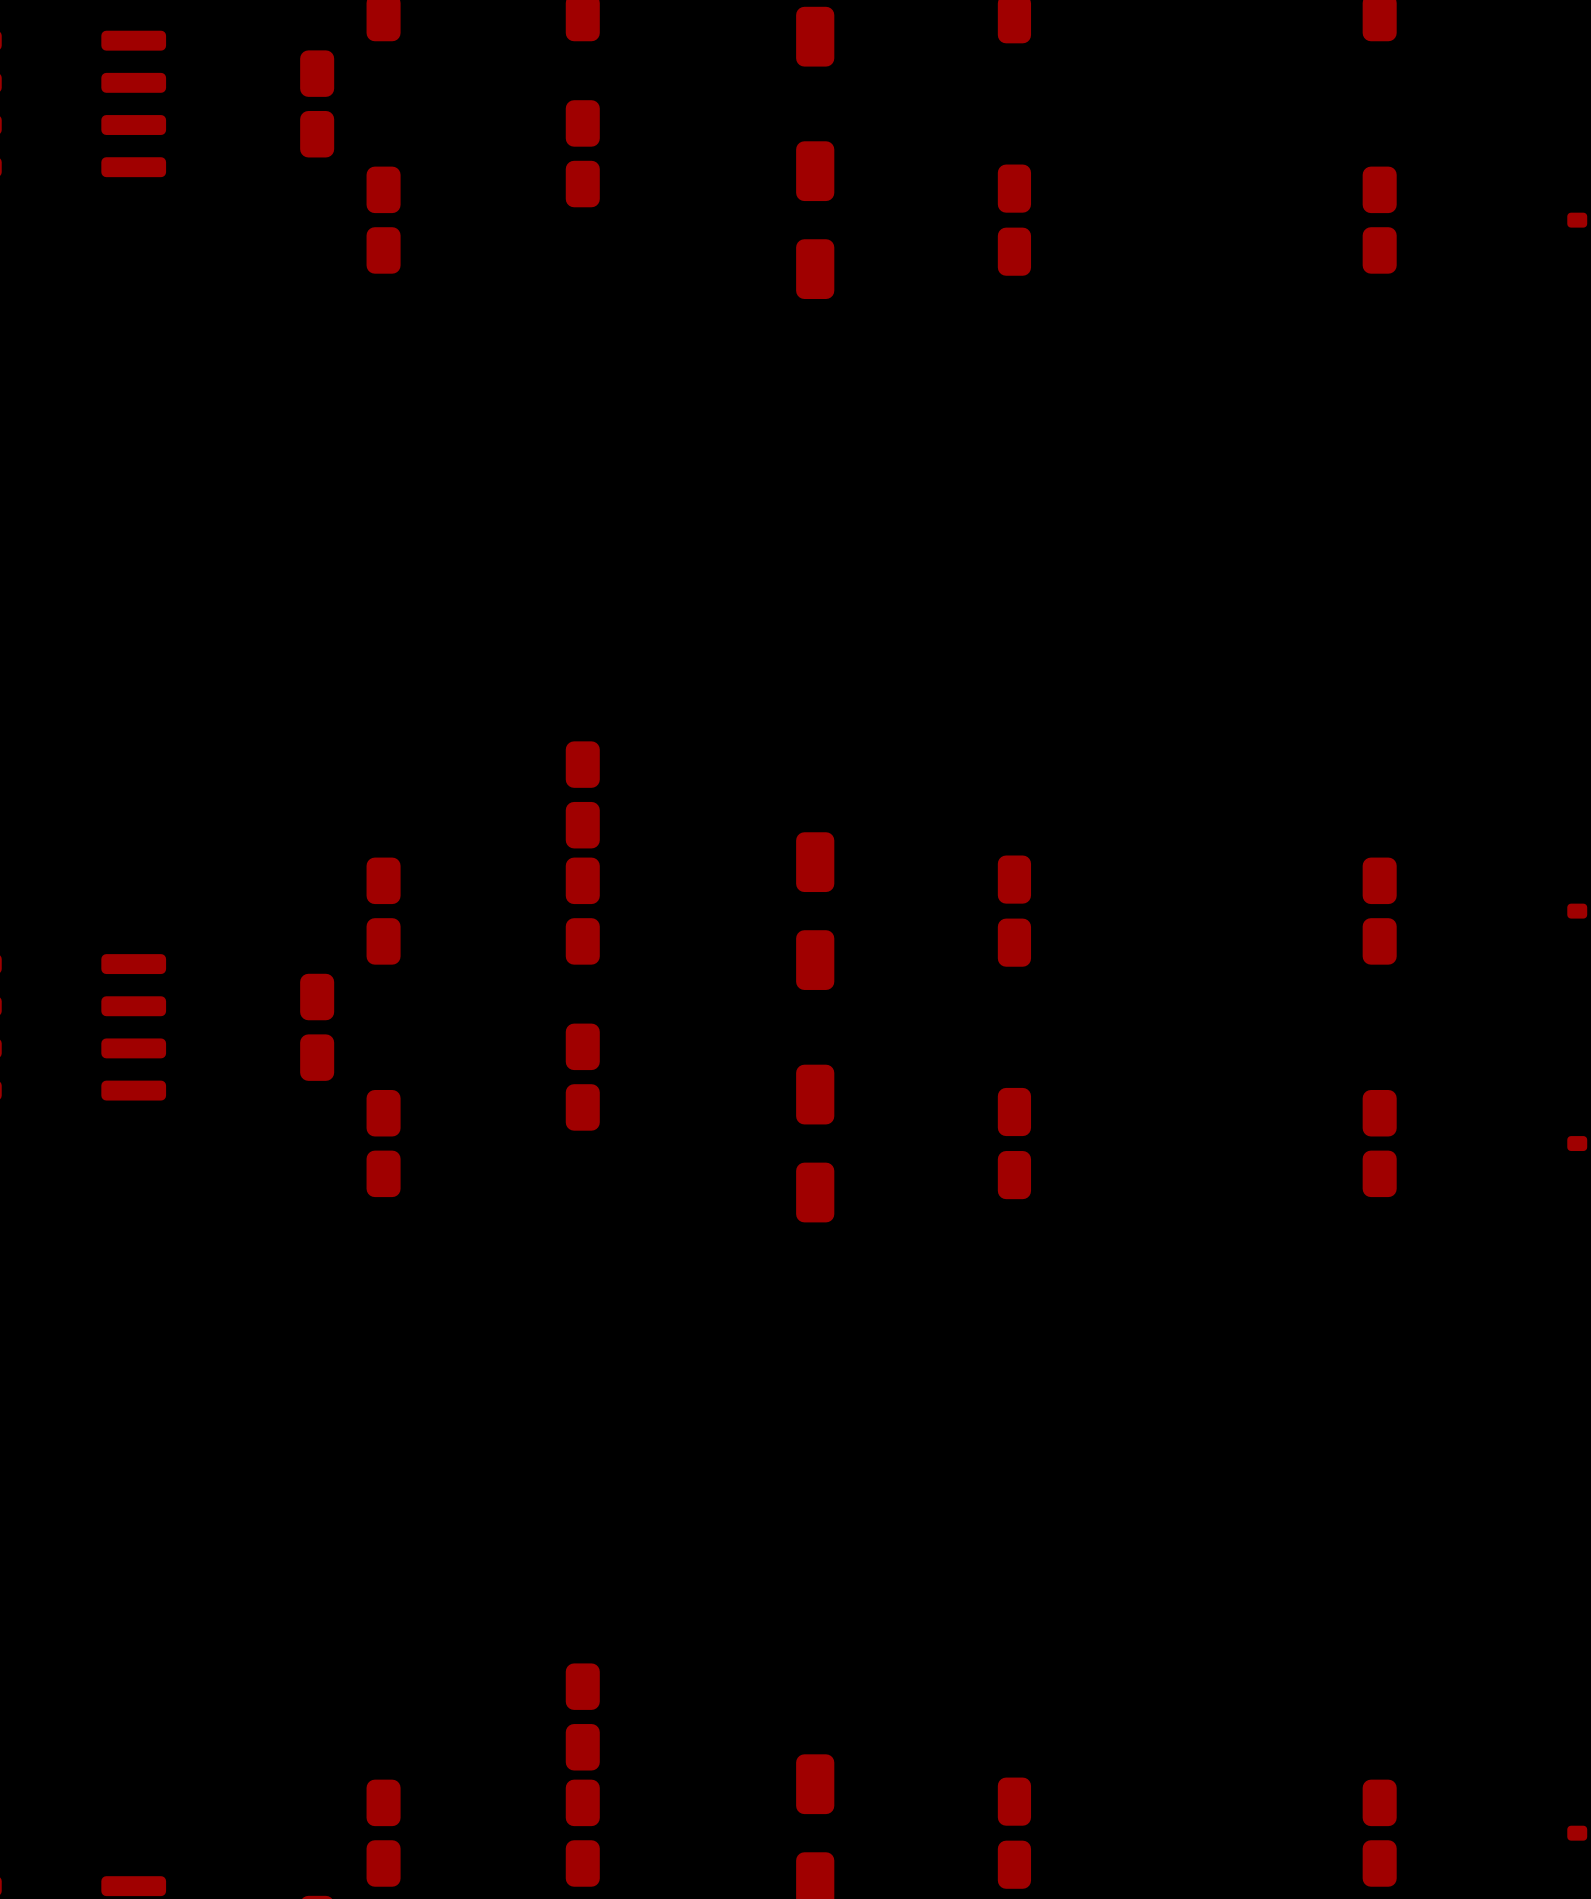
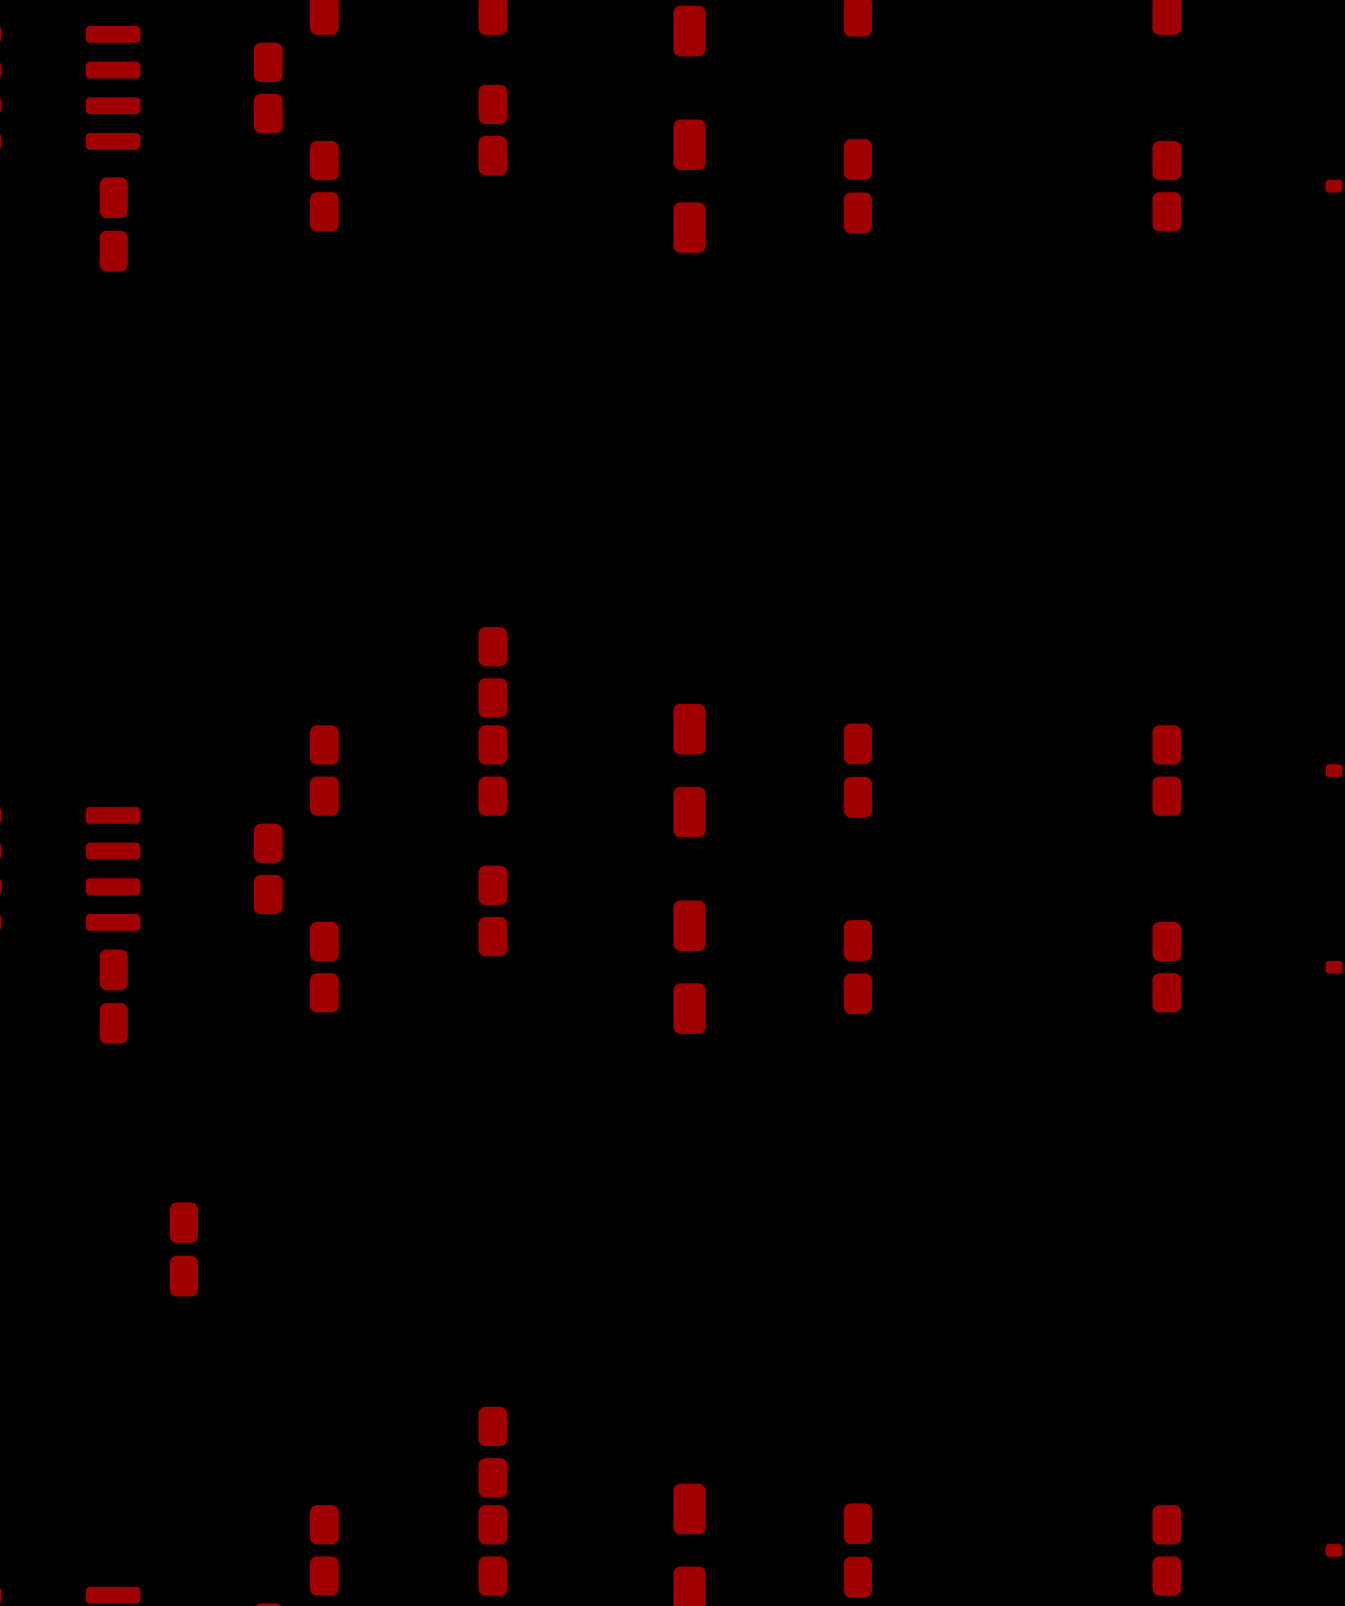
part: none -> (113, 224)
part: none -> (113, 996)
part: none -> (183, 1249)

